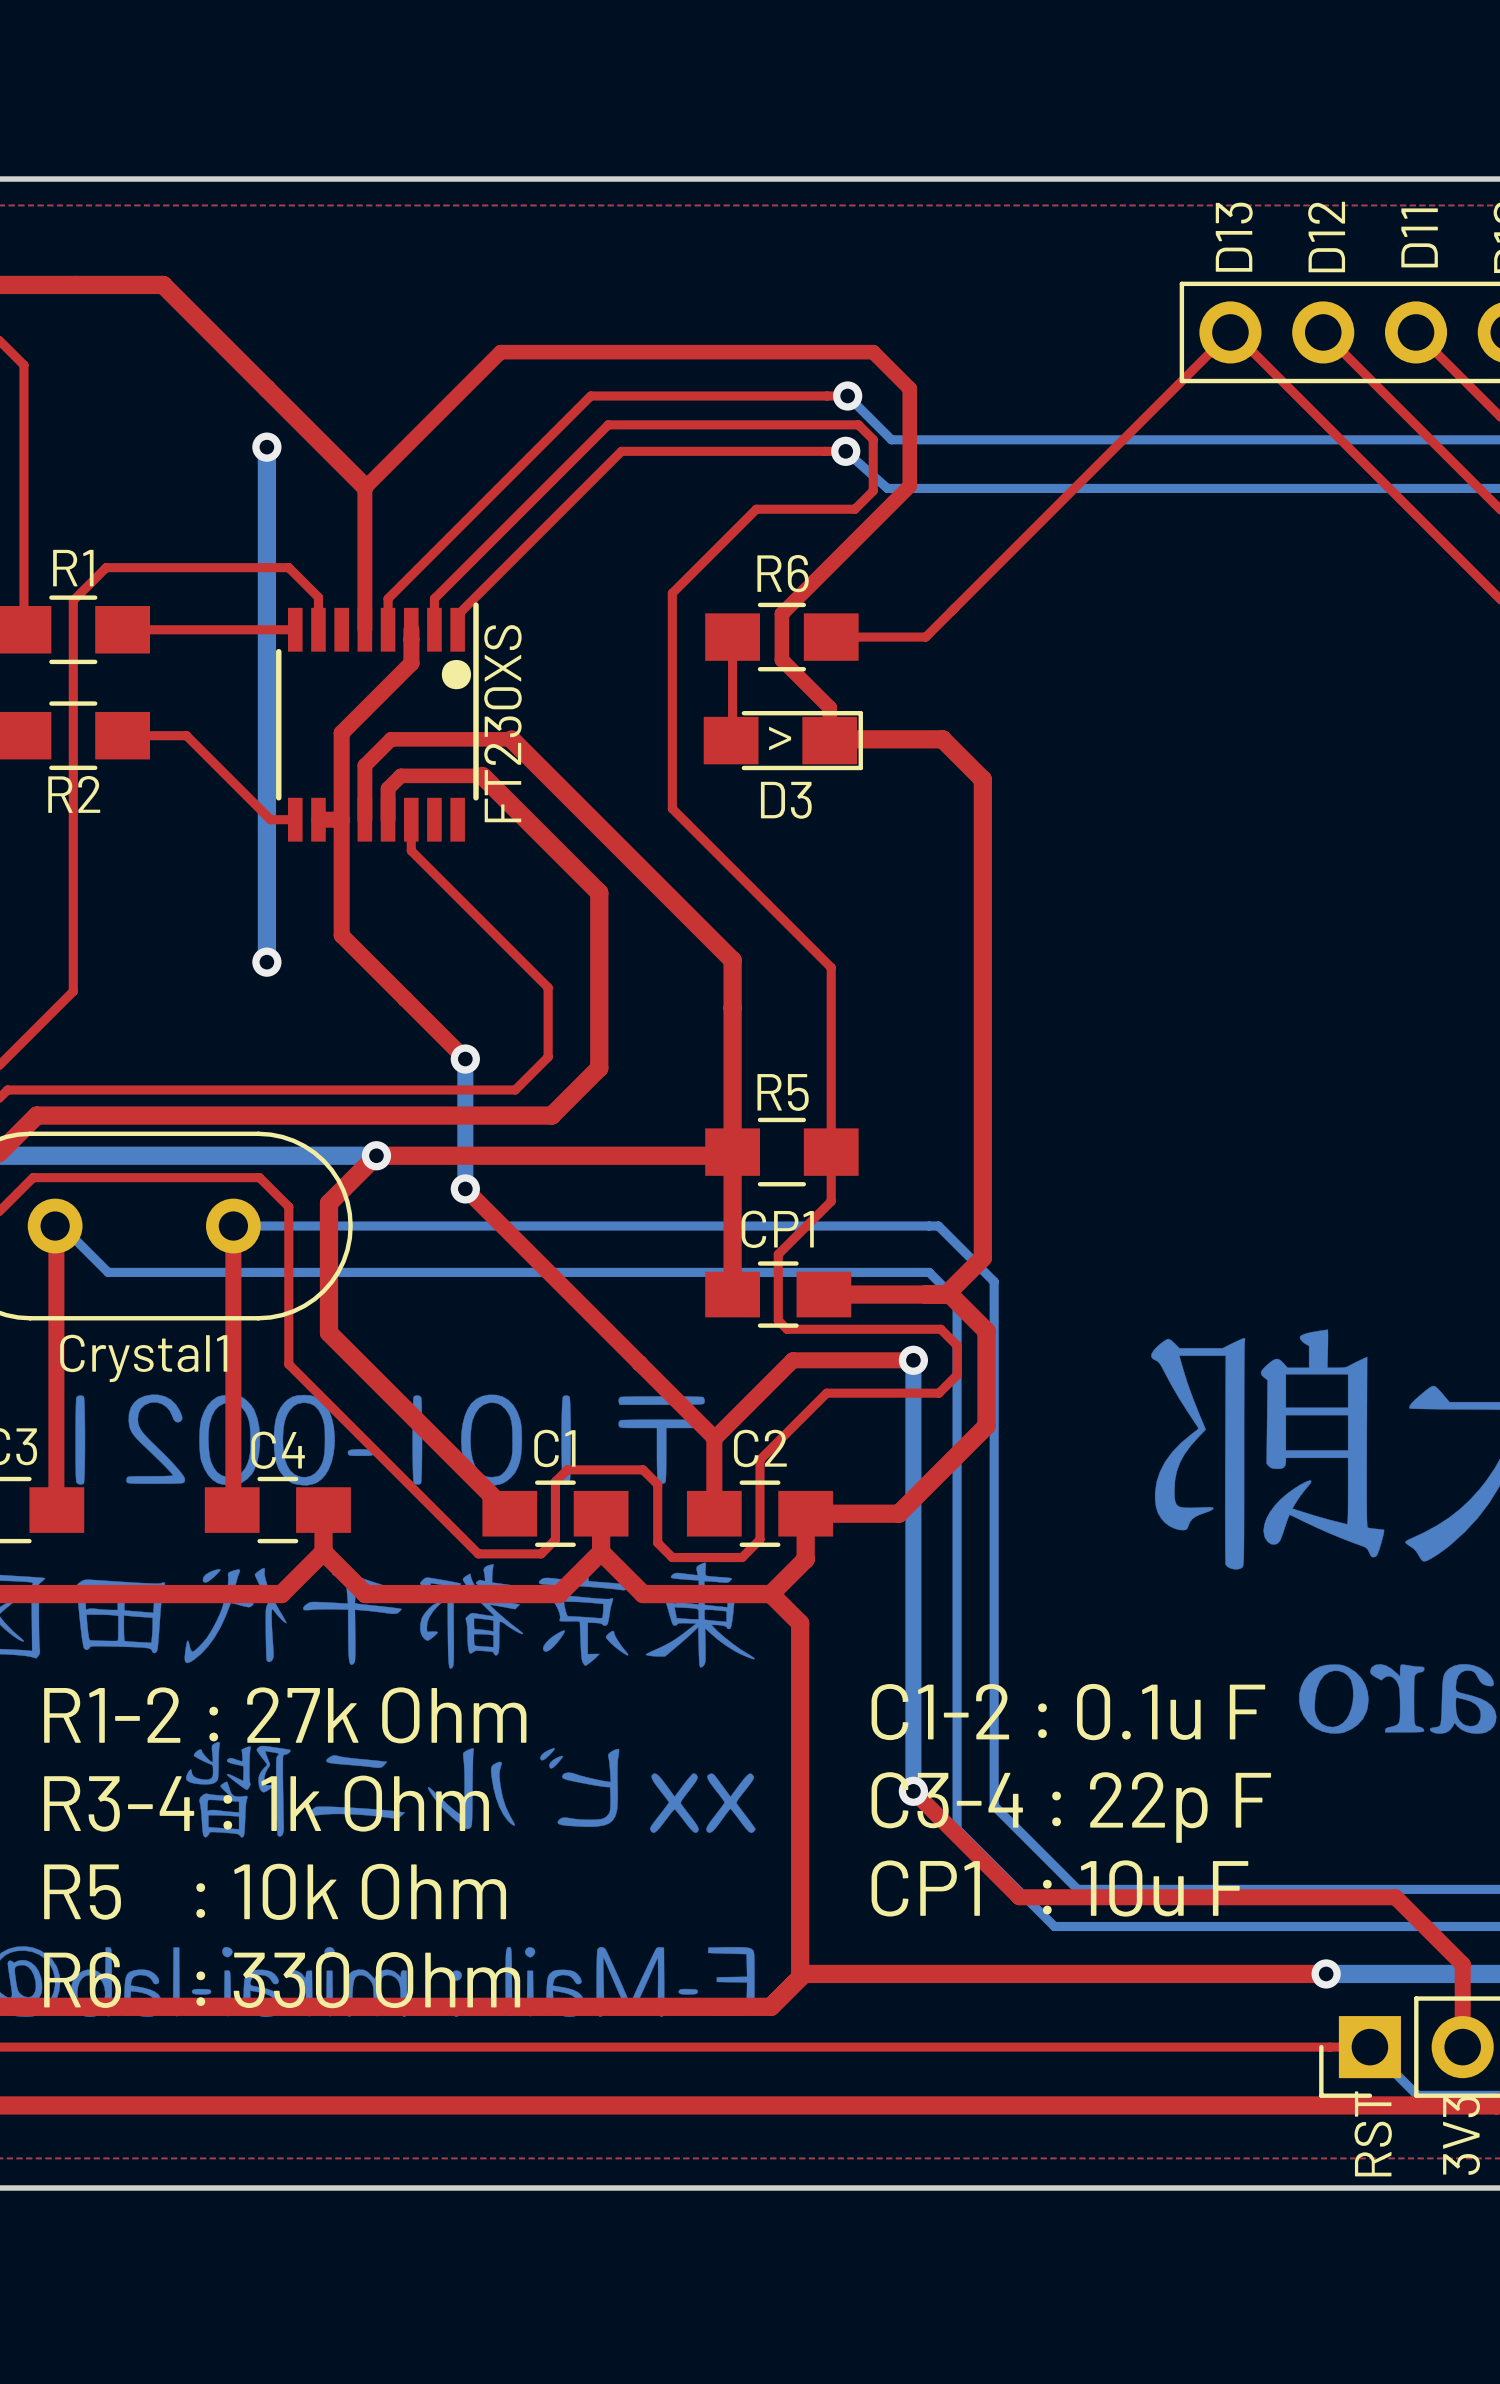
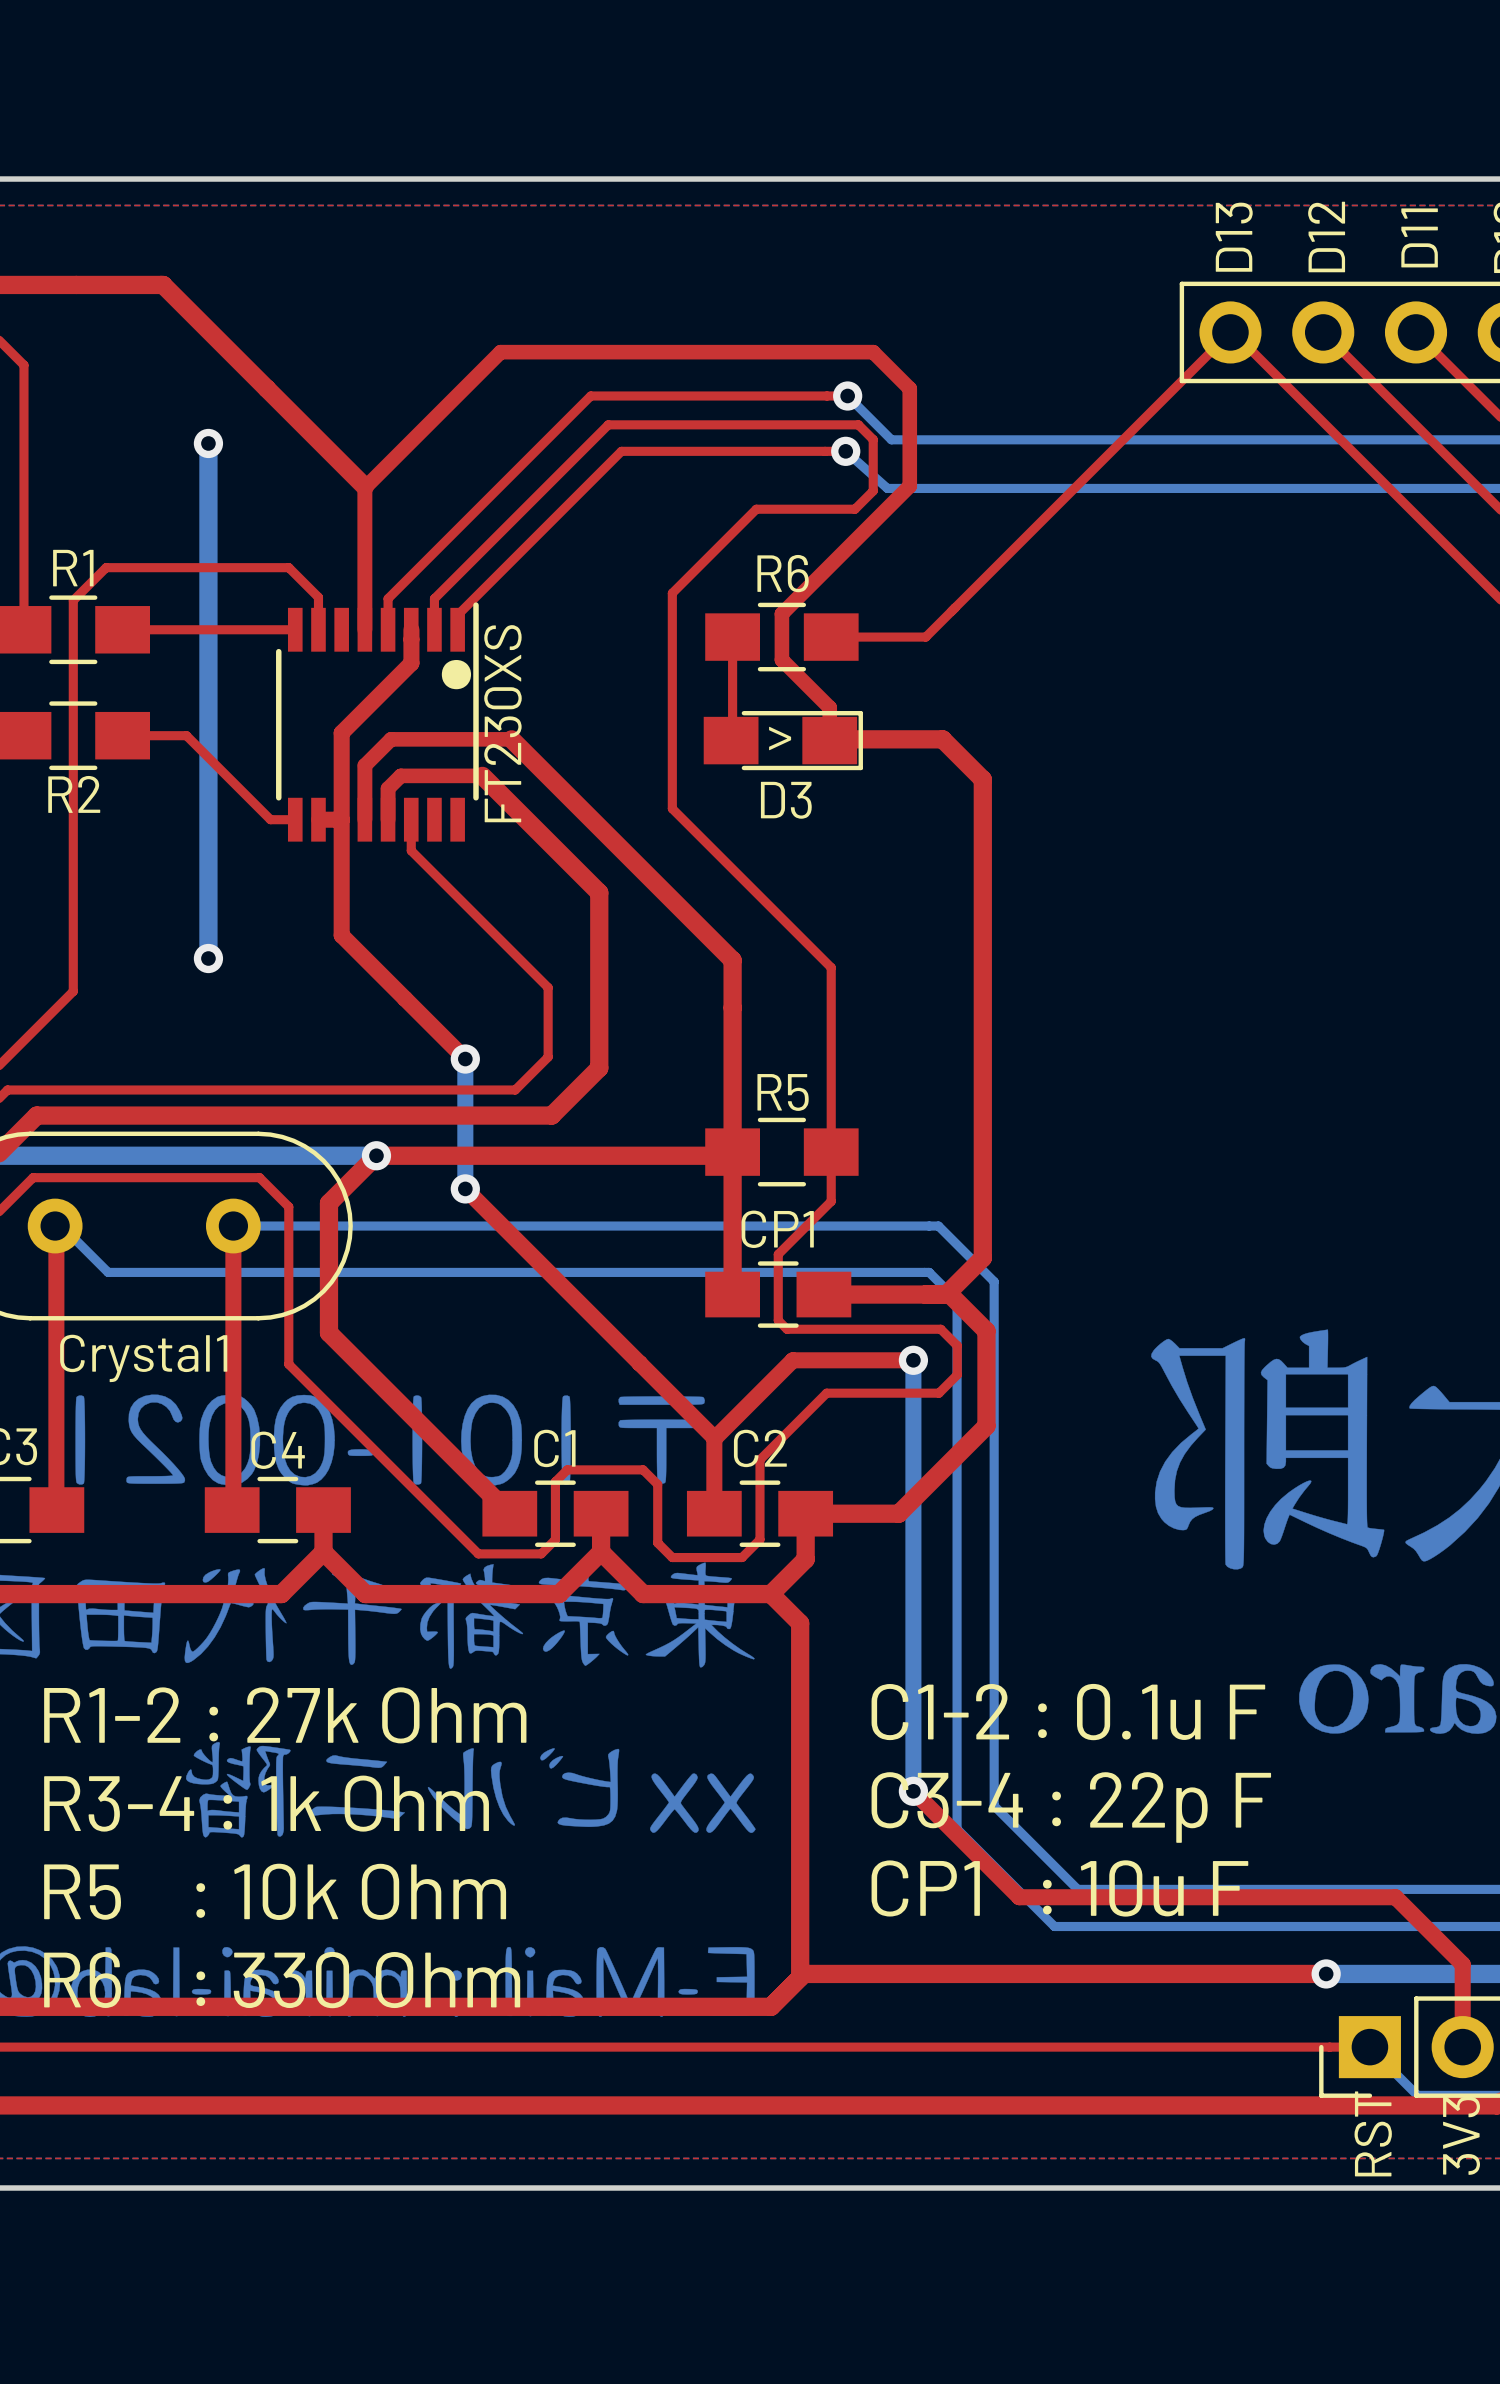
bottom track: (266, 447) (266, 962) -> (208, 443) (208, 958)
via position: (266, 447) -> (208, 443)
via position: (266, 962) -> (208, 958)

